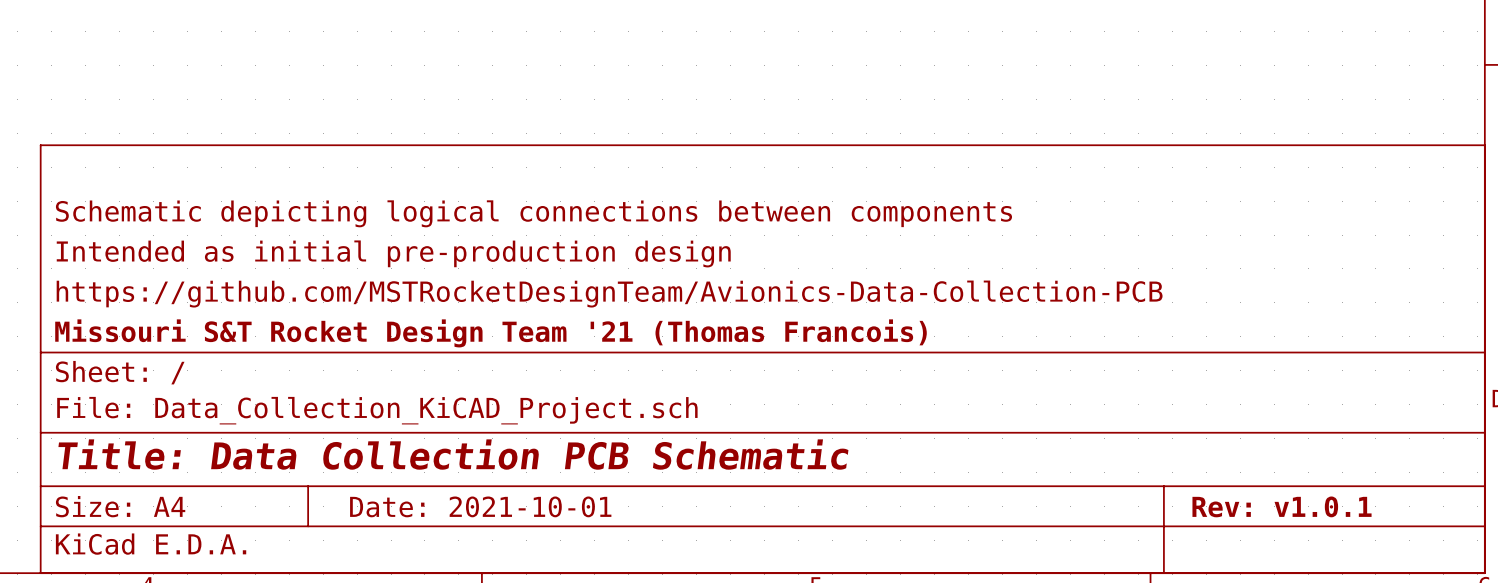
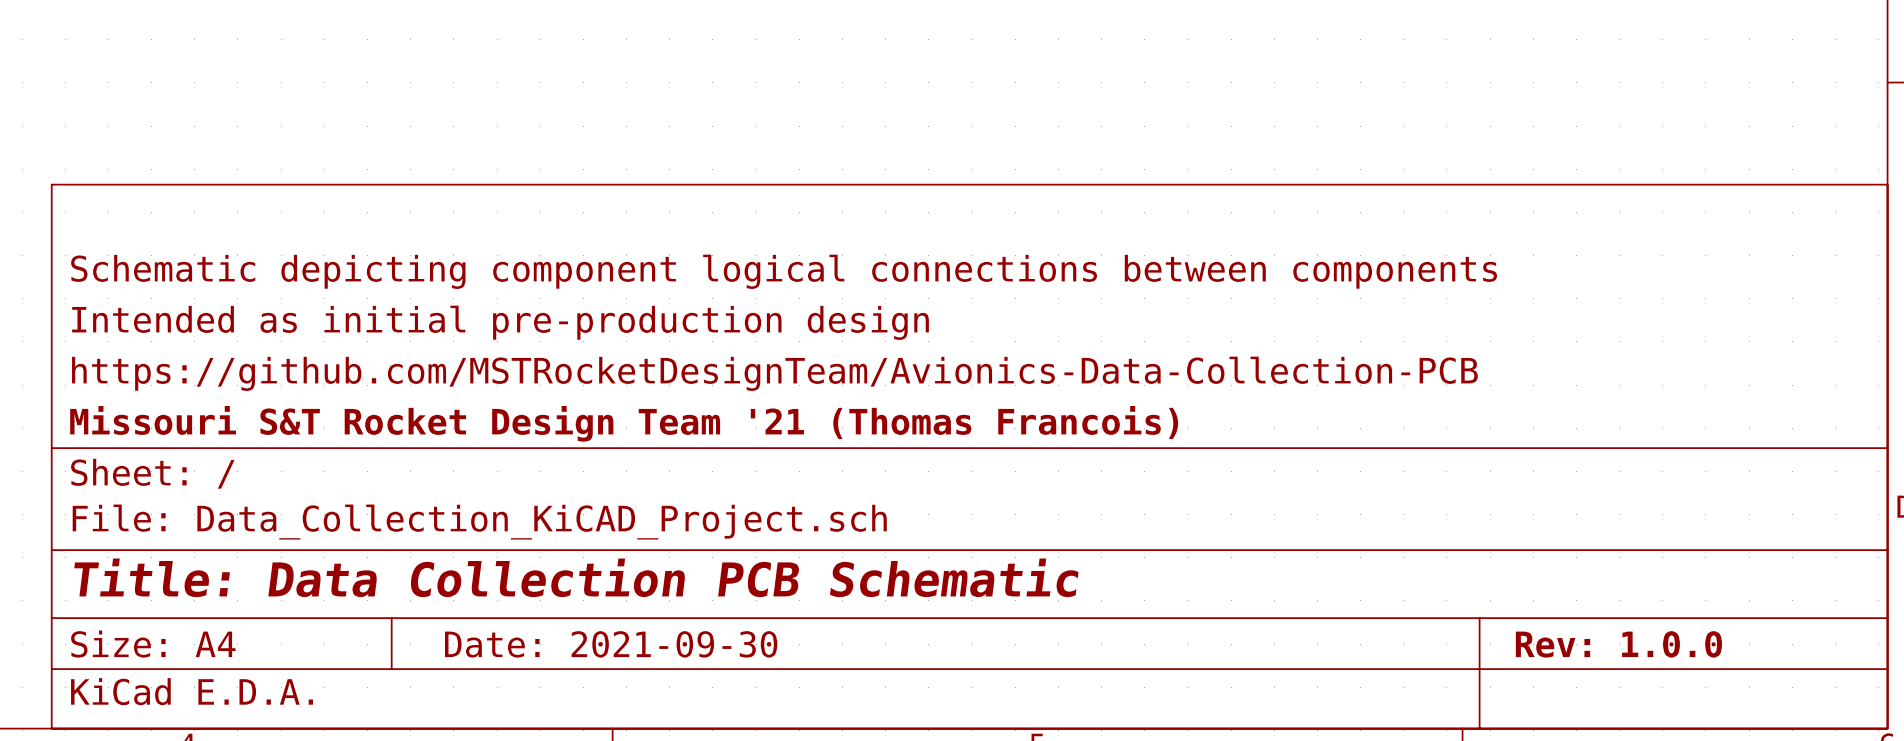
title block: Schematic depicting logical connections between components (533, 213) -> Schematic depicting component logical connections between components (784, 271)
title block: Date: 2021-10-01 (480, 506) -> Date: 2021-09-30 (611, 644)
title block: Rev: v1.0.1 (1282, 506) -> Rev: 1.0.0 (1618, 644)

